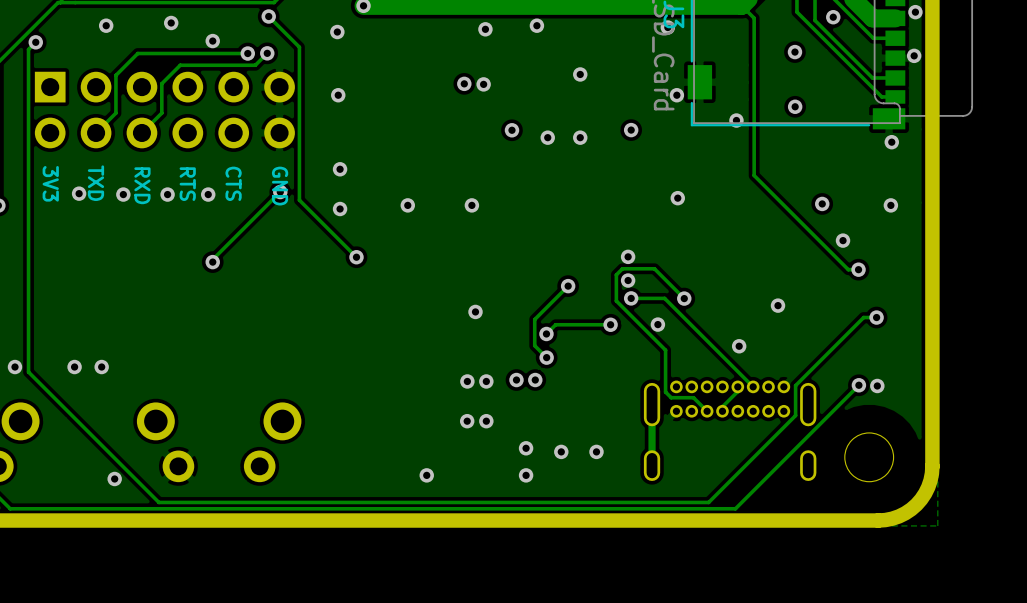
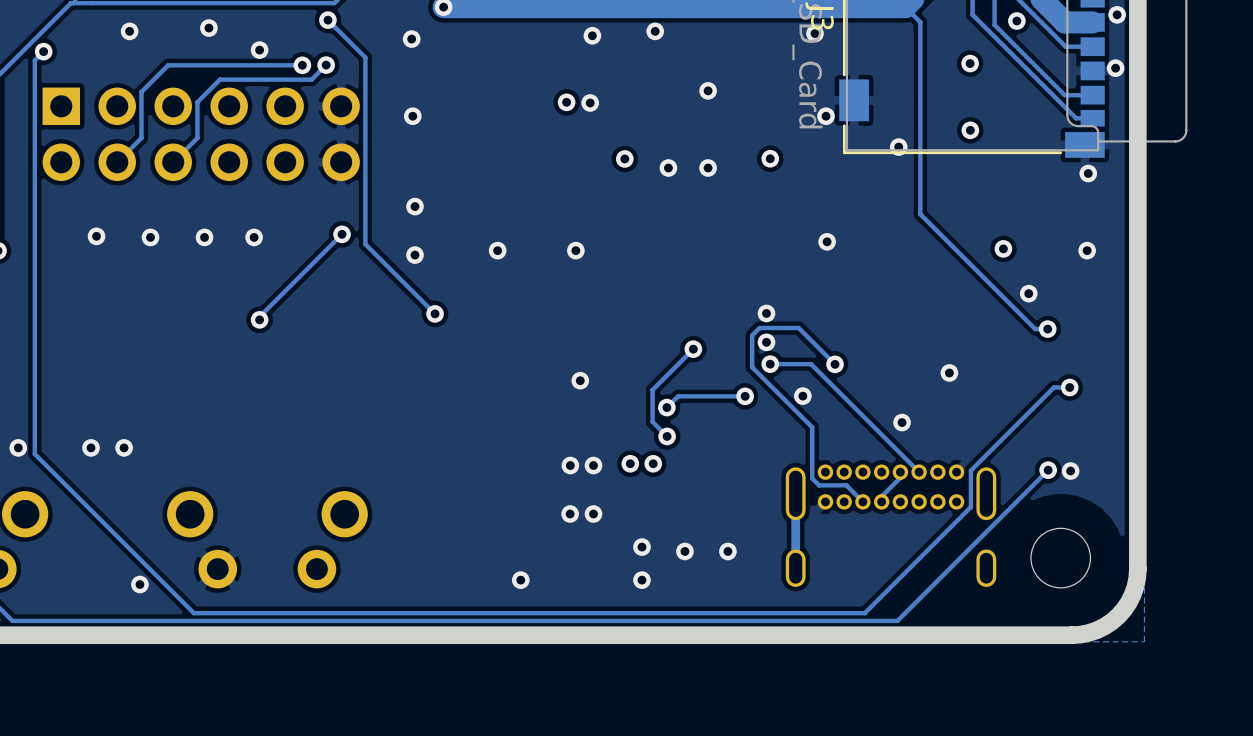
text: 3V3 (50, 183) -> none
text: TXD (95, 183) -> none
text: CTS (233, 183) -> none
text: RTS (187, 184) -> none
text: RXD (142, 185) -> none
text: GND (280, 186) -> none

